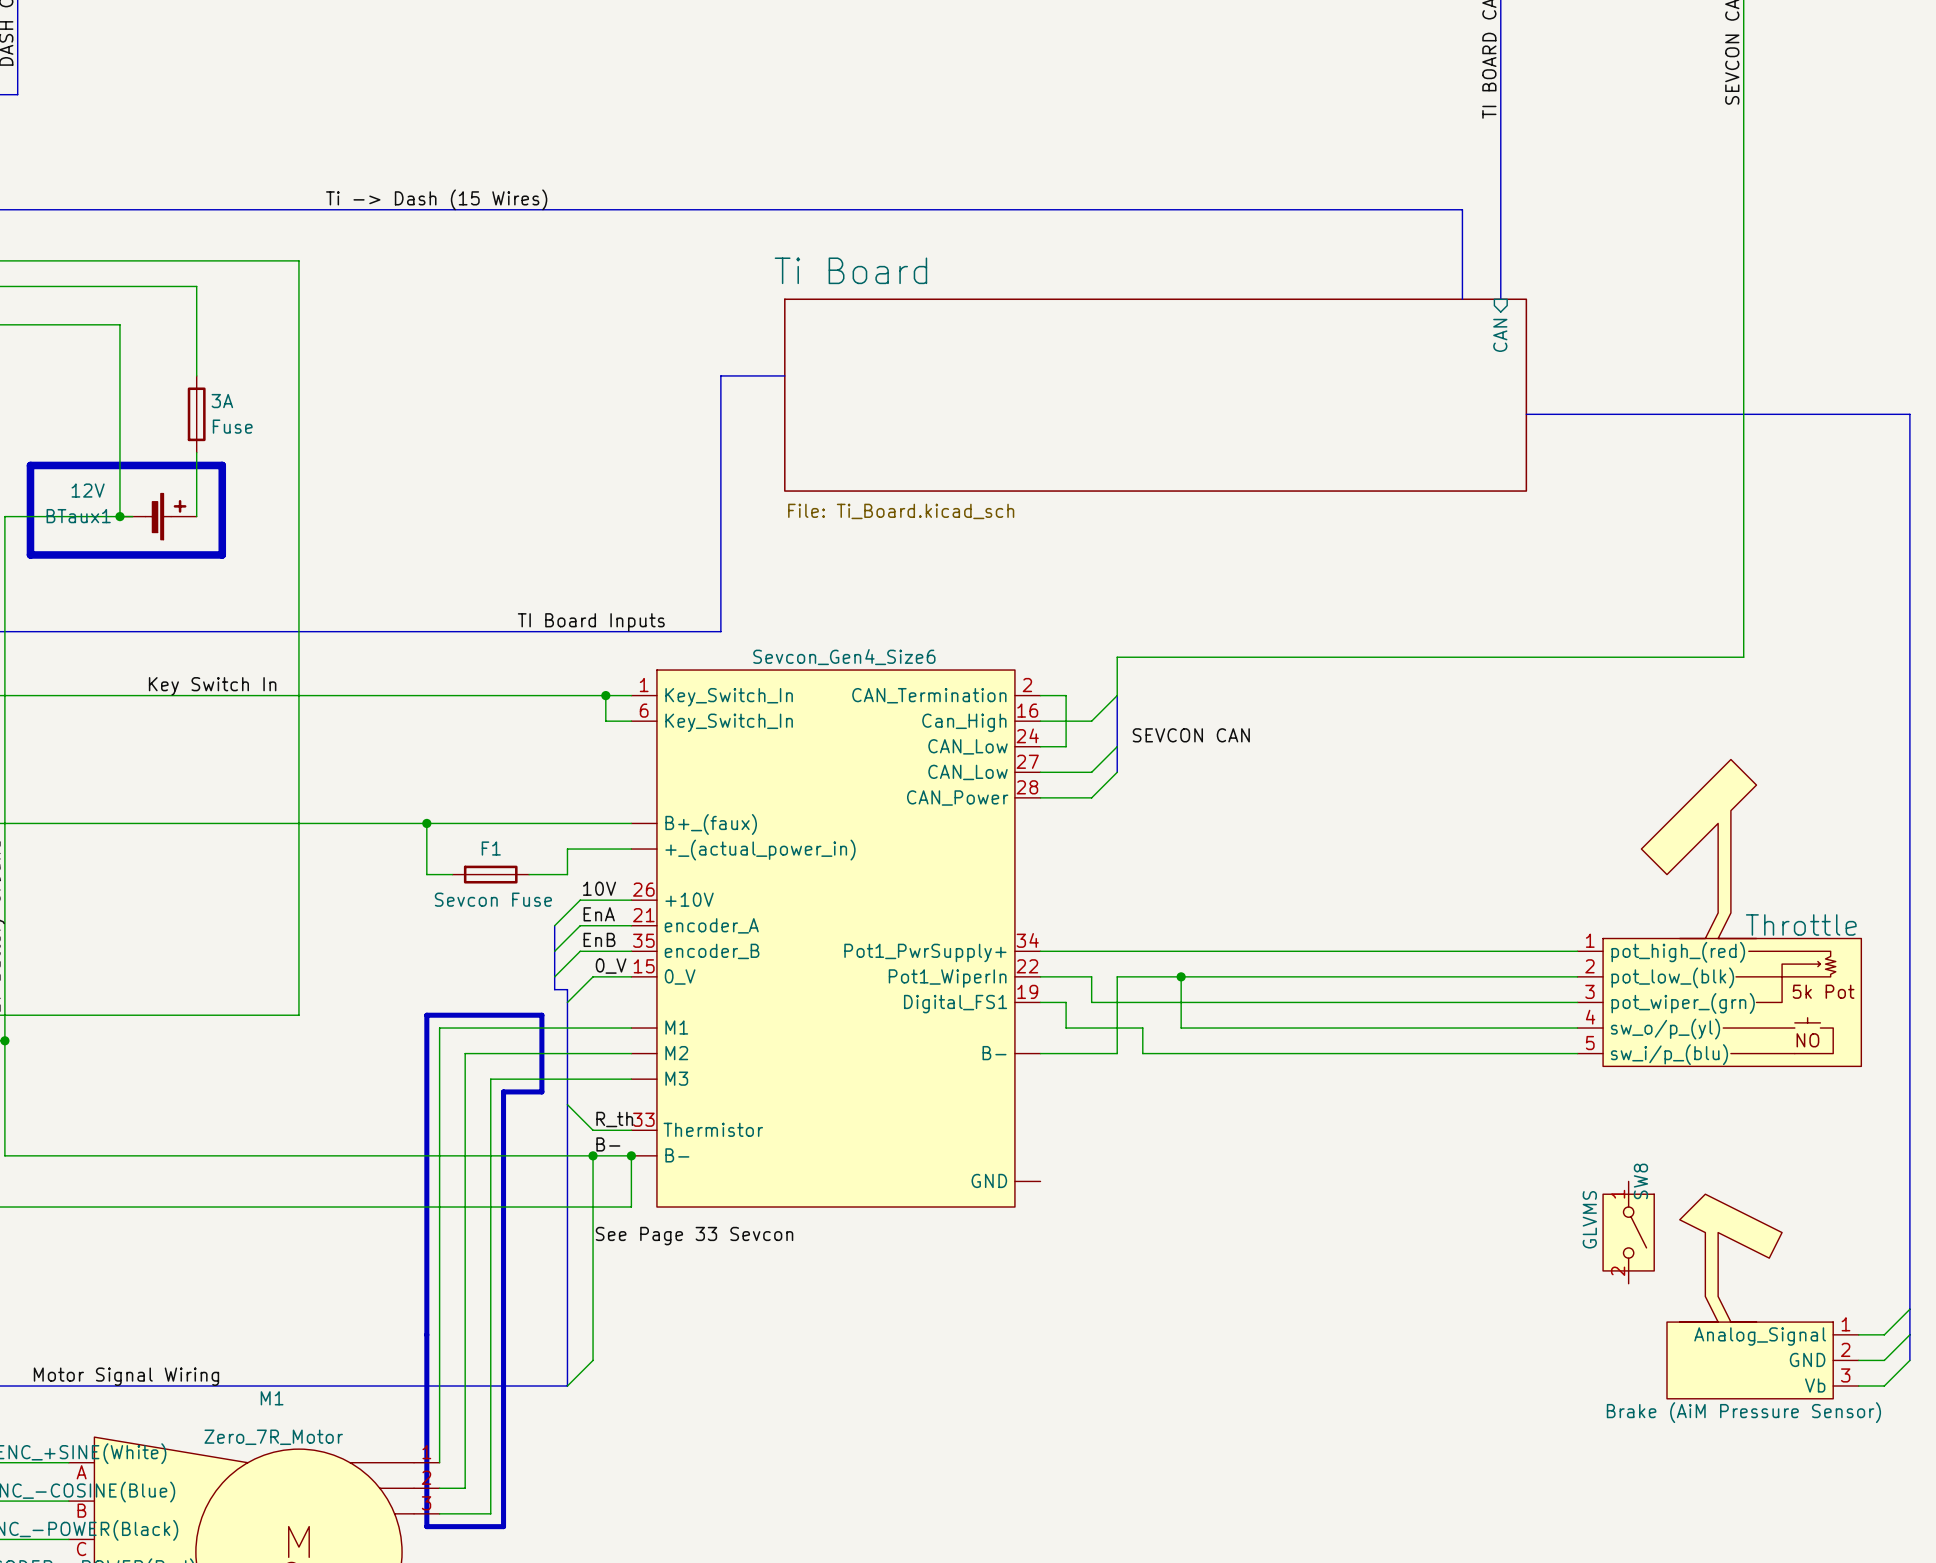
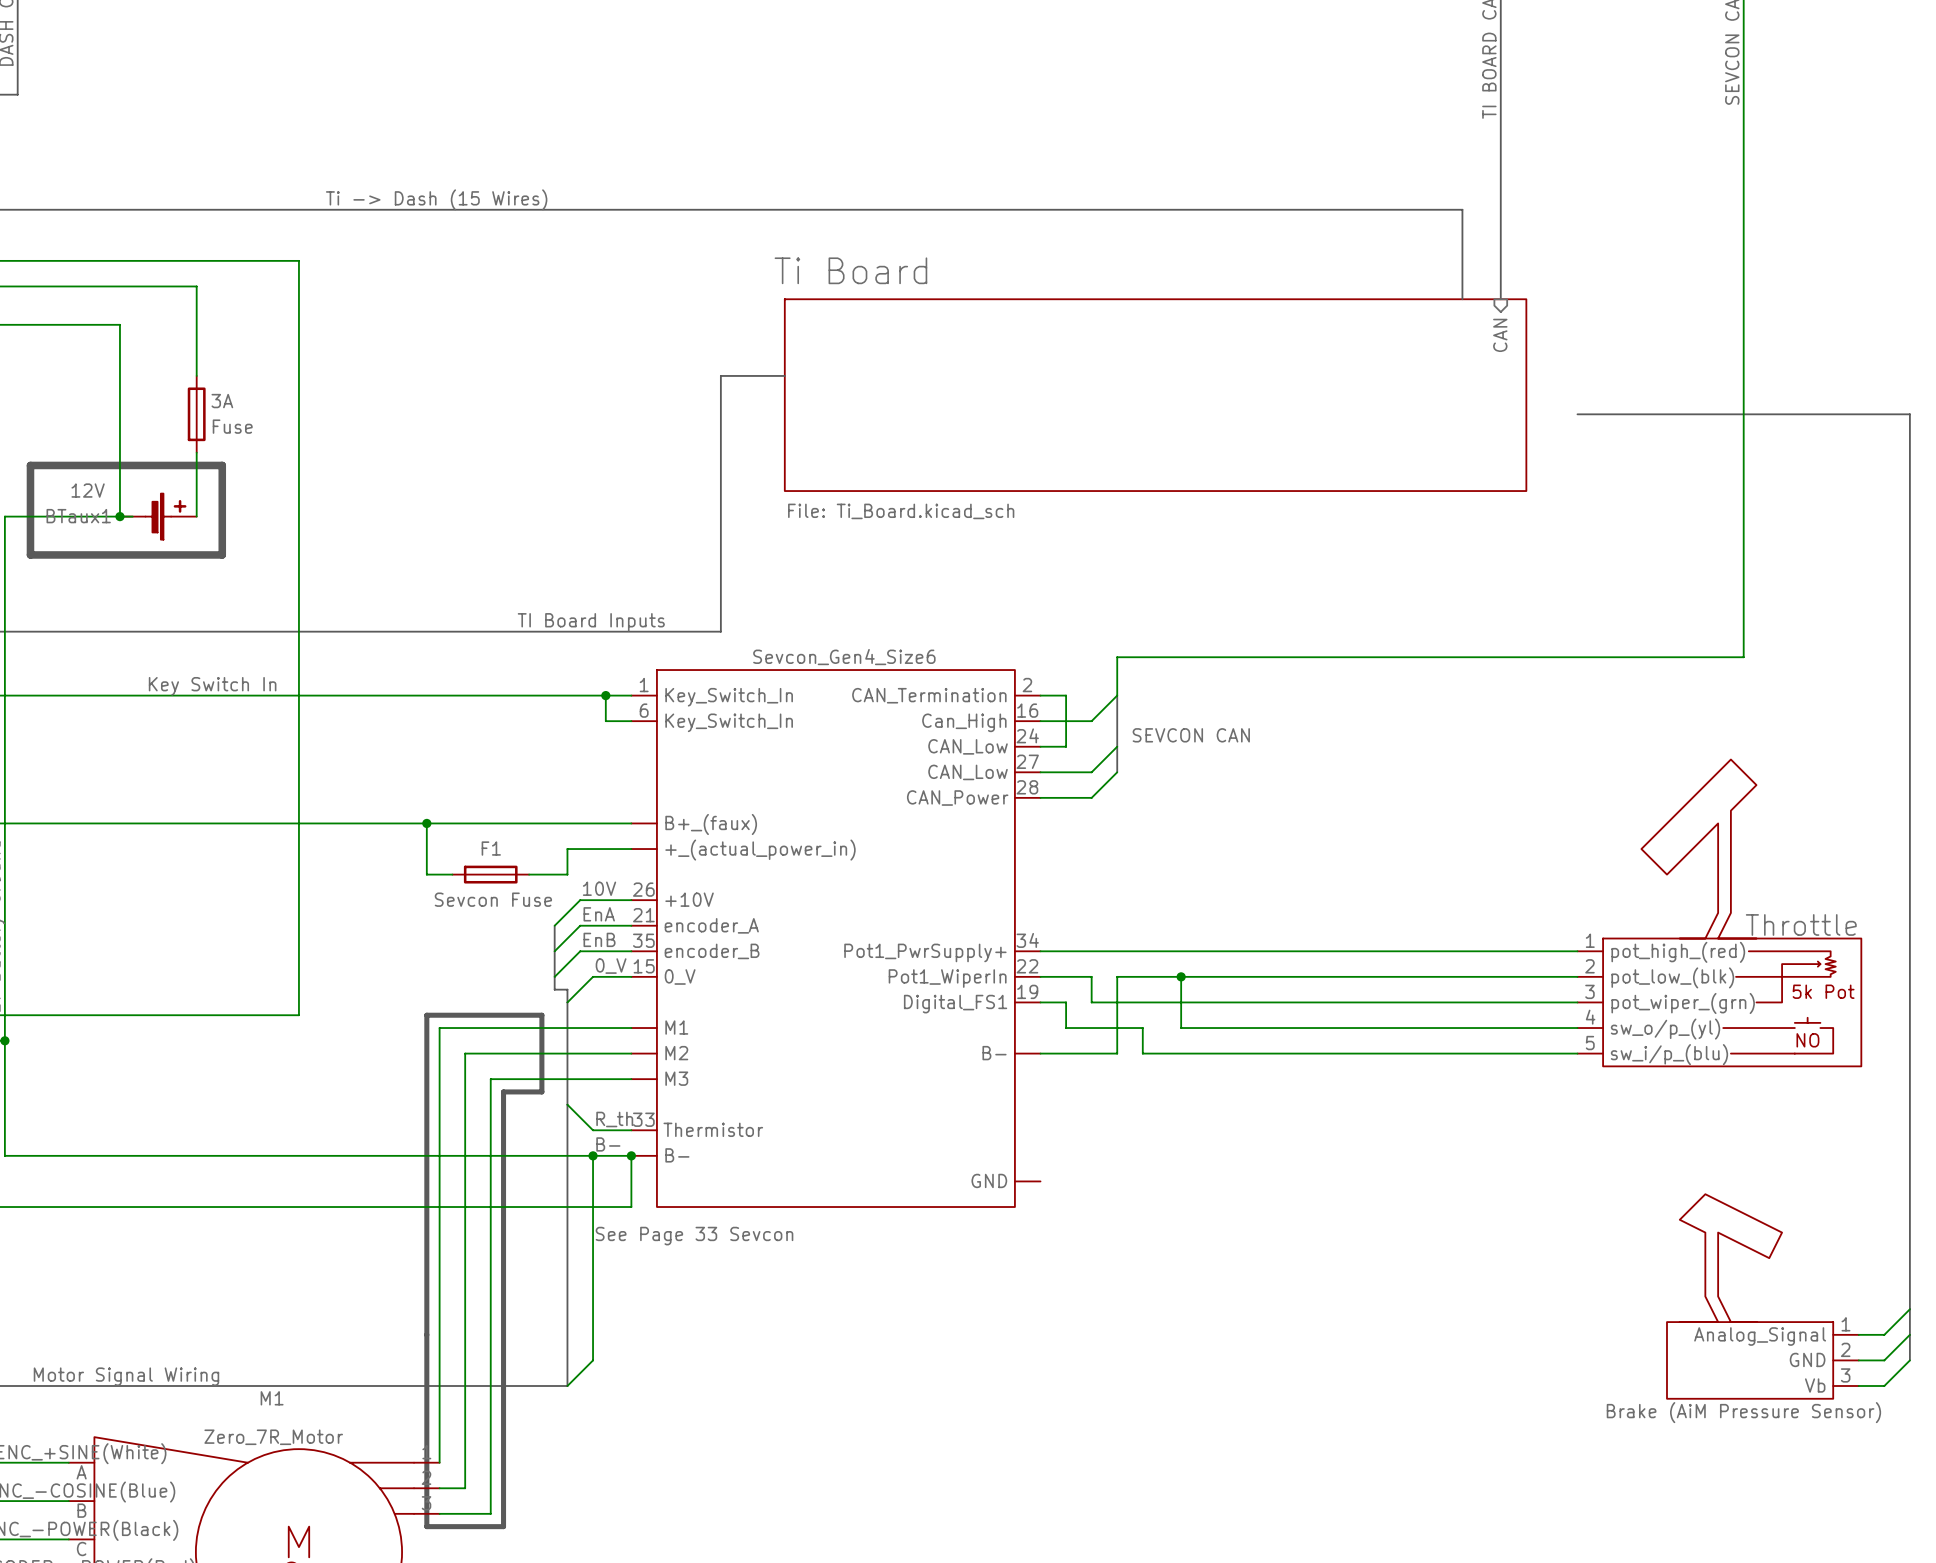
bus: (1526, 414) (1577, 414) -> none
SW8: GLVMS (1628, 1232) -> none

